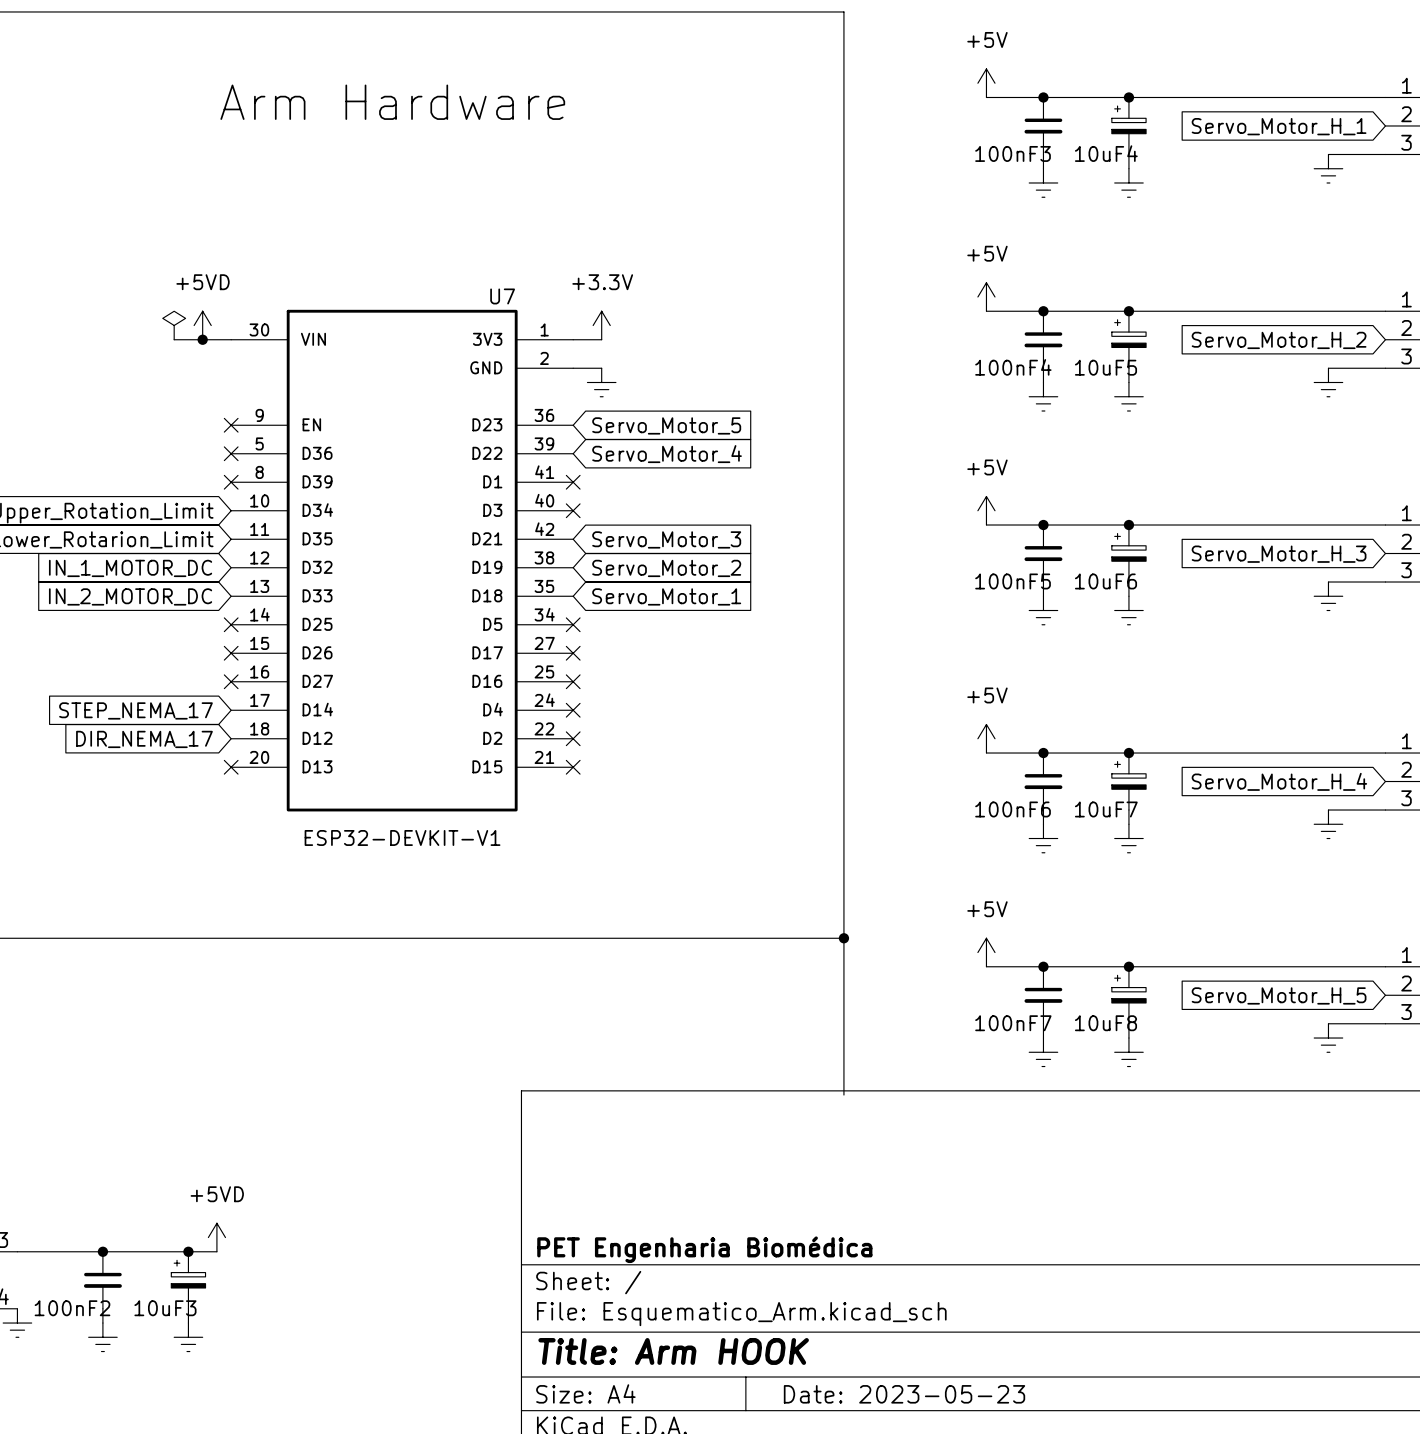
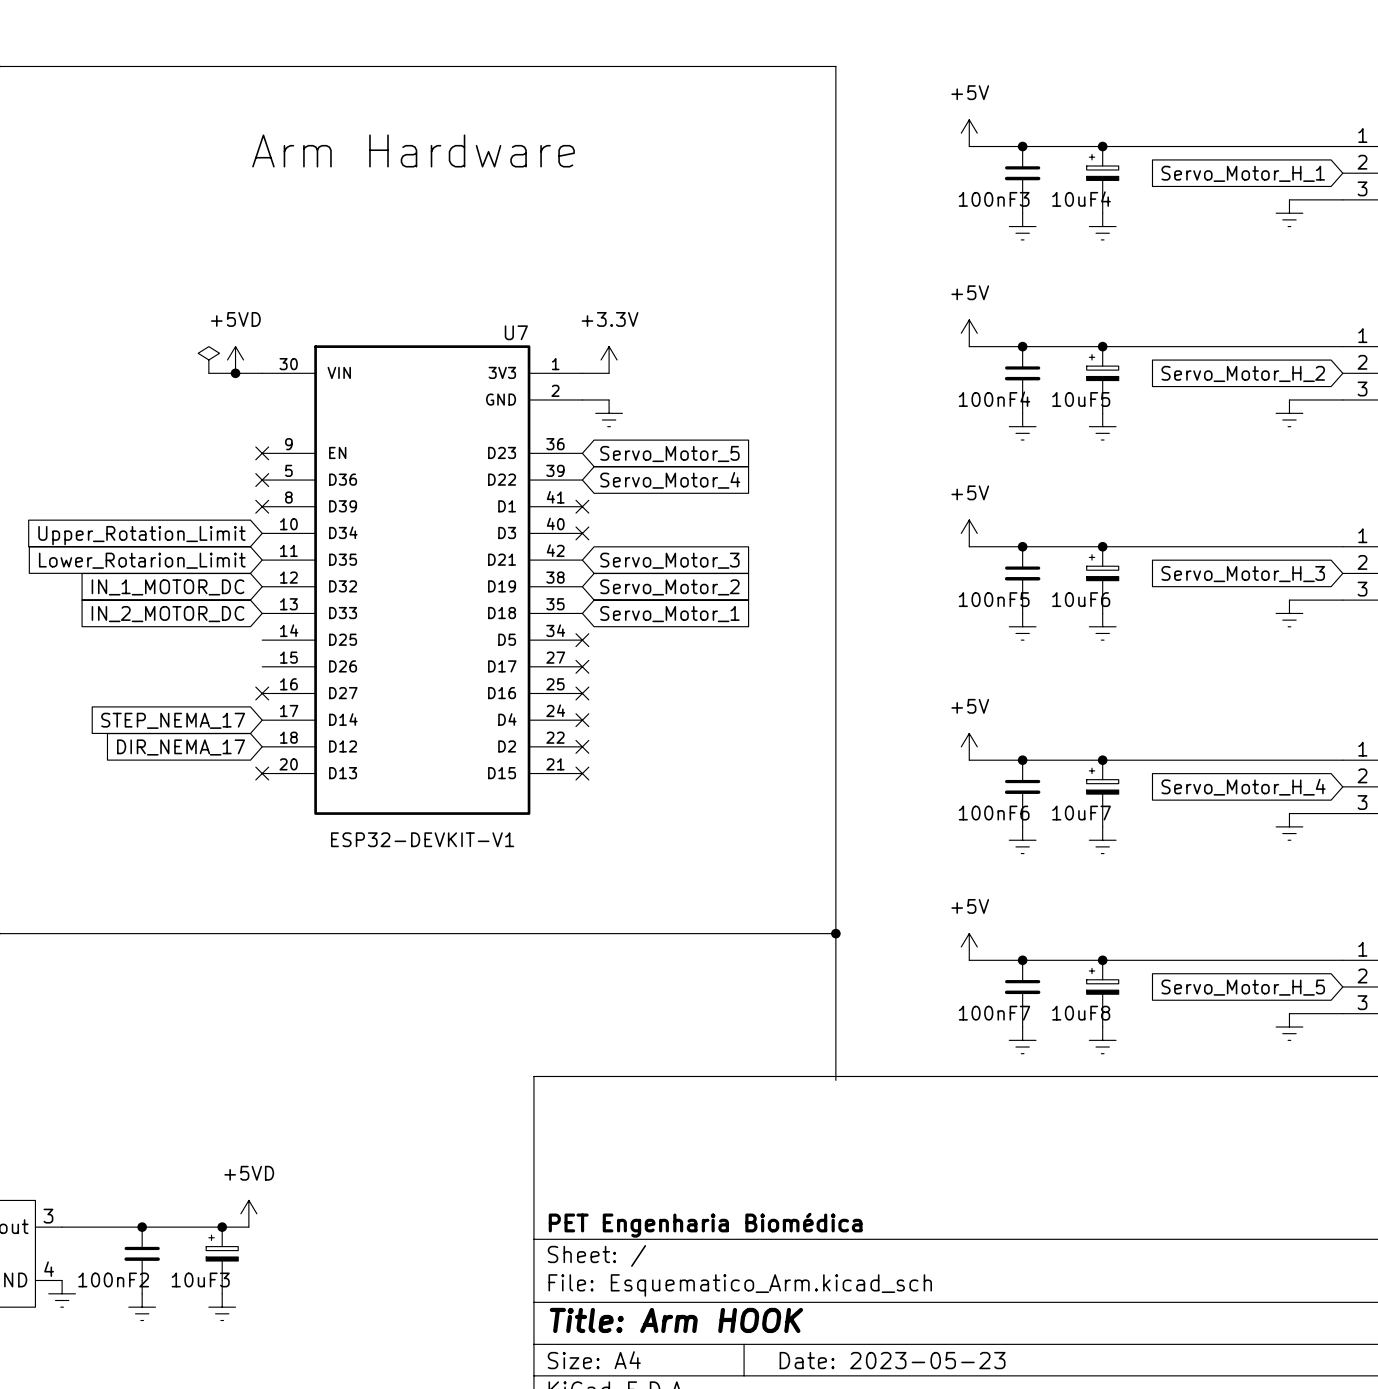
no-connect mark: (231, 624) -> none
no-connect mark: (231, 653) -> none

